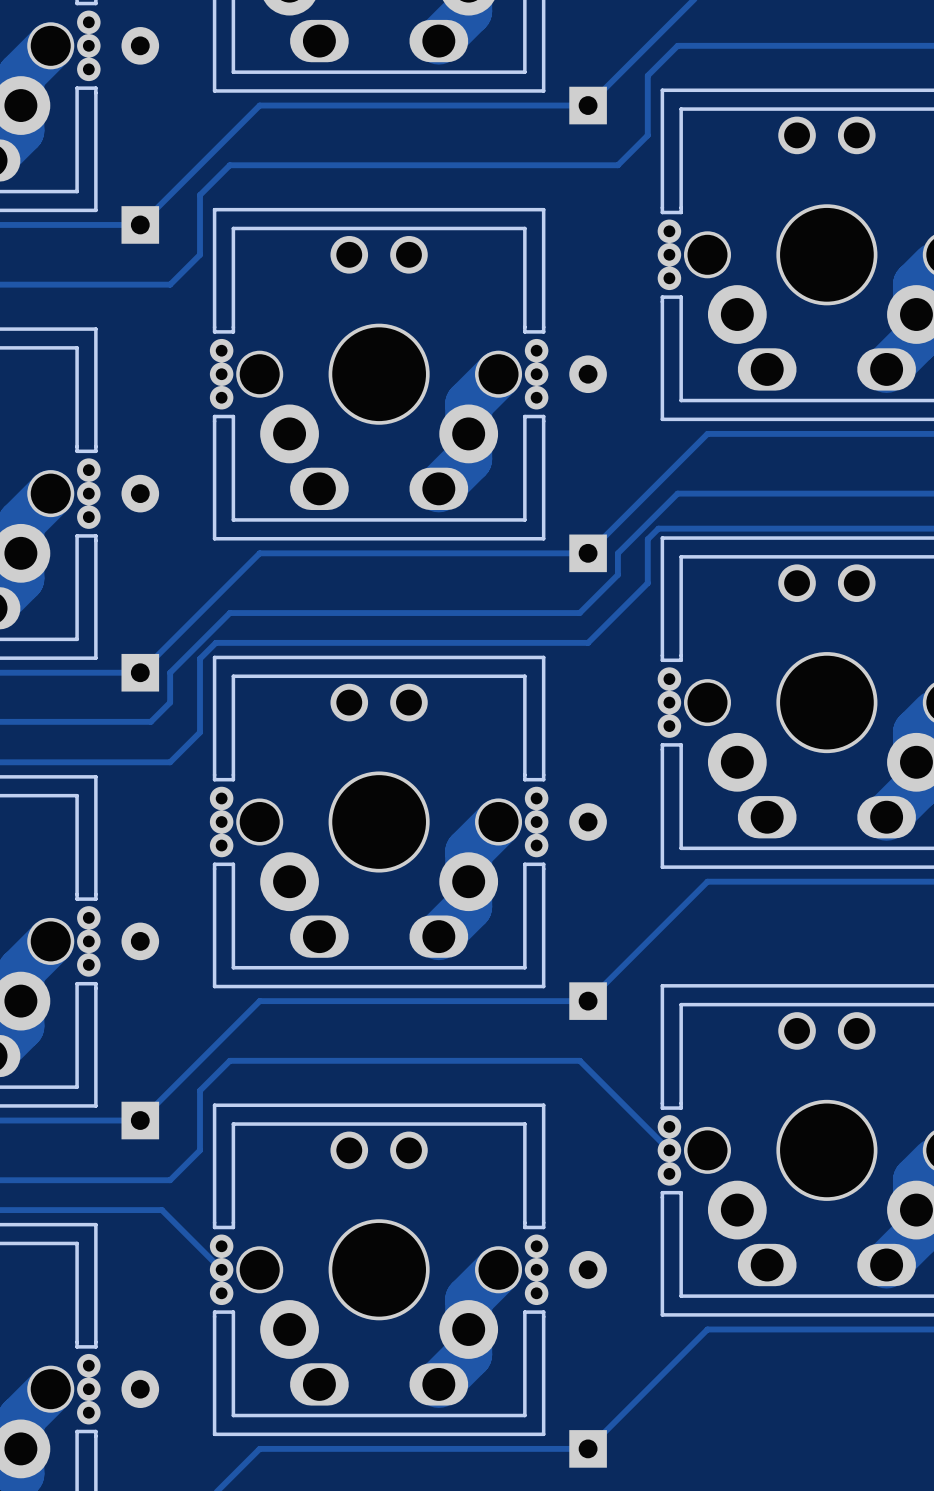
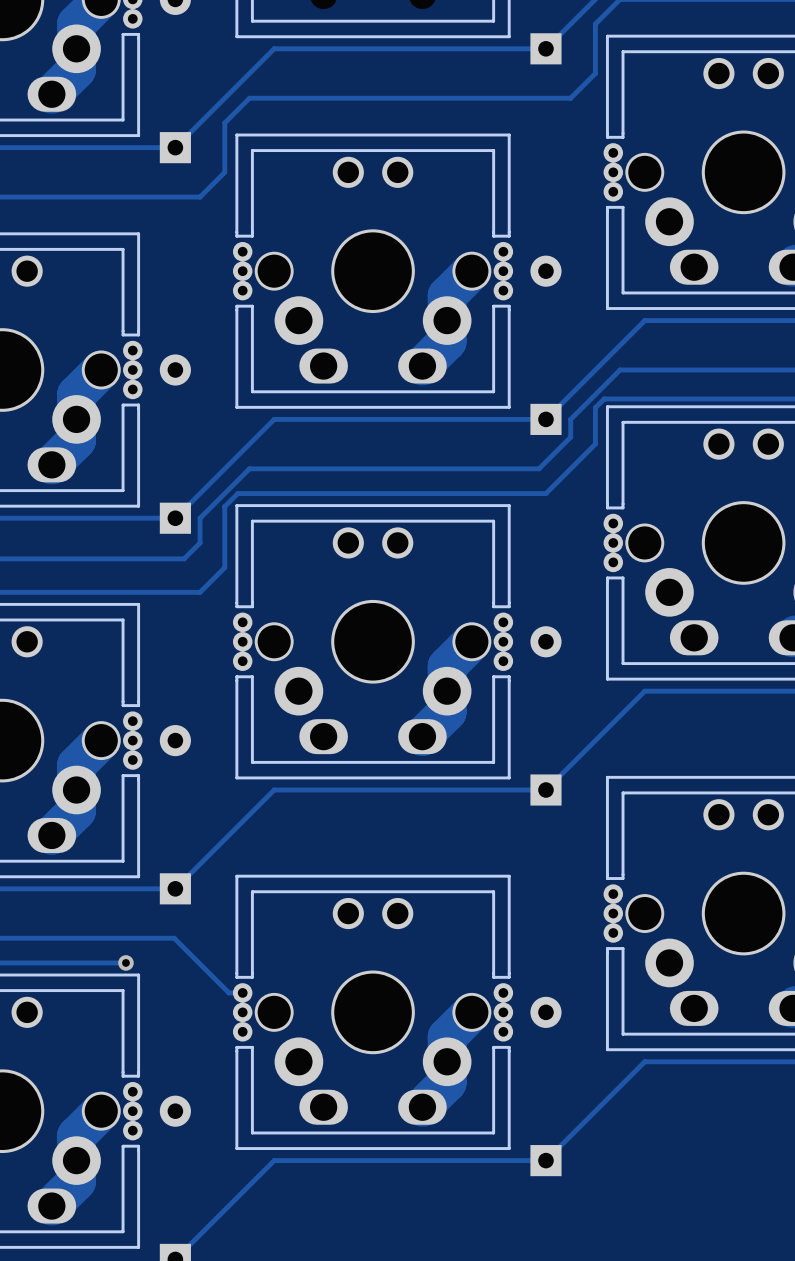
track: (669, 1150) (579, 1060) (229, 1060) (200, 1090) (200, 1150) (170, 1180) (138, 1180) -> (242, 992) (228, 992) (174, 938)
track: (80, 1210) (161, 1210) (221, 1269) -> none
via: none -> (125, 962)

